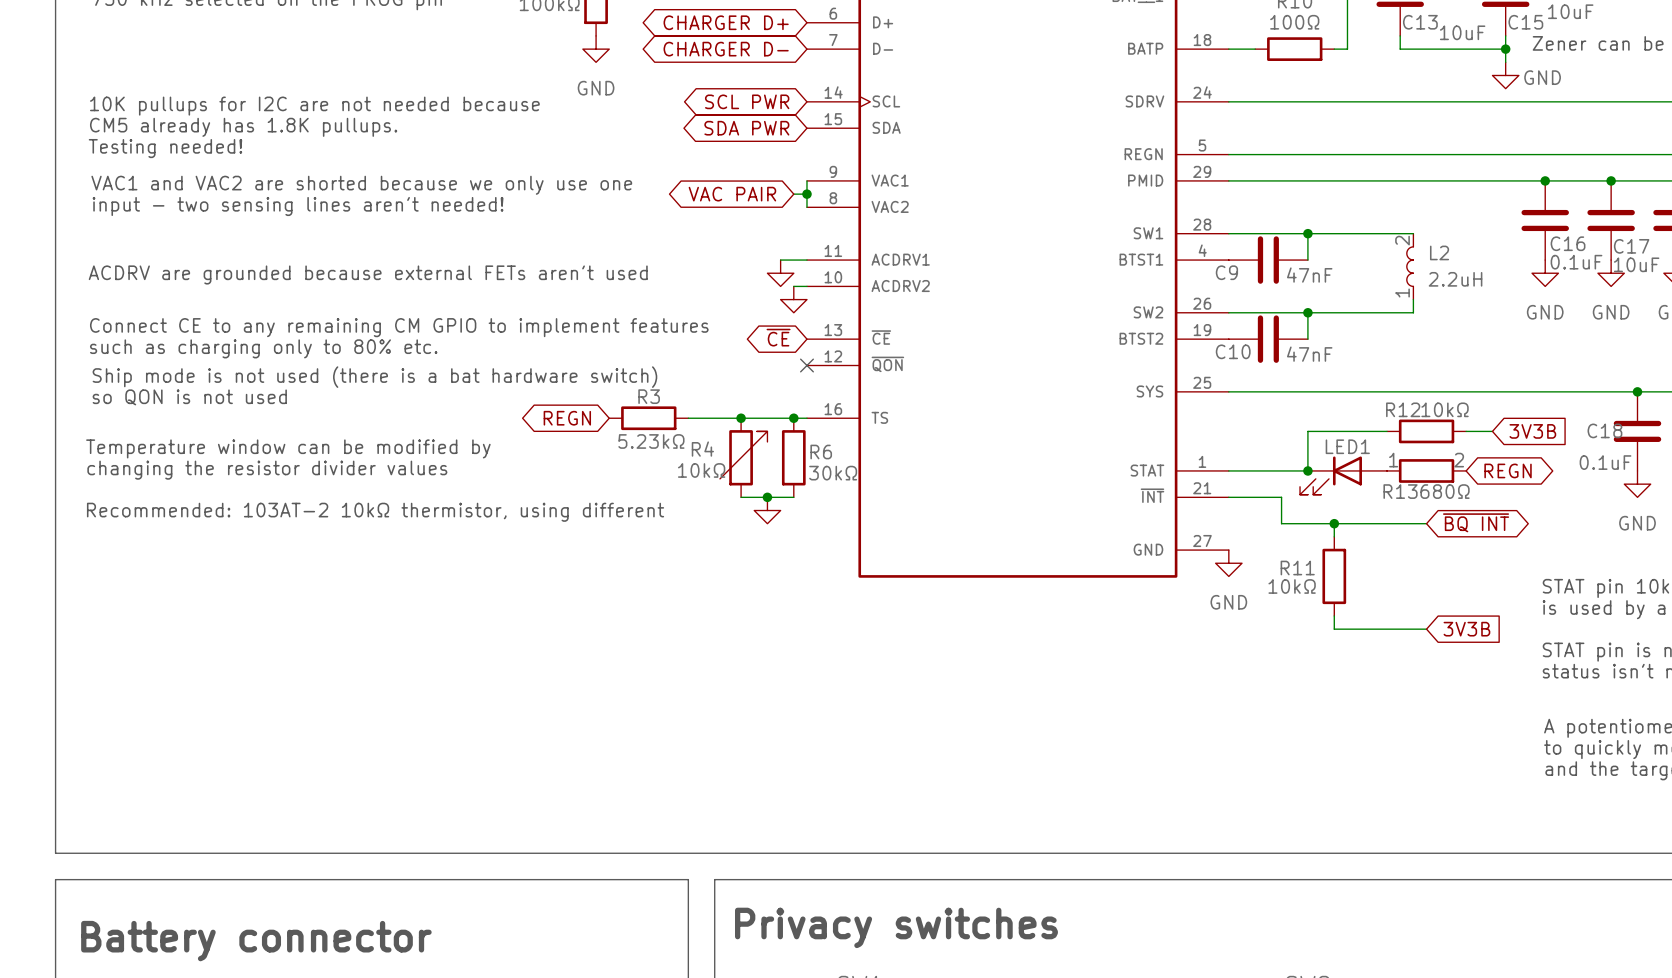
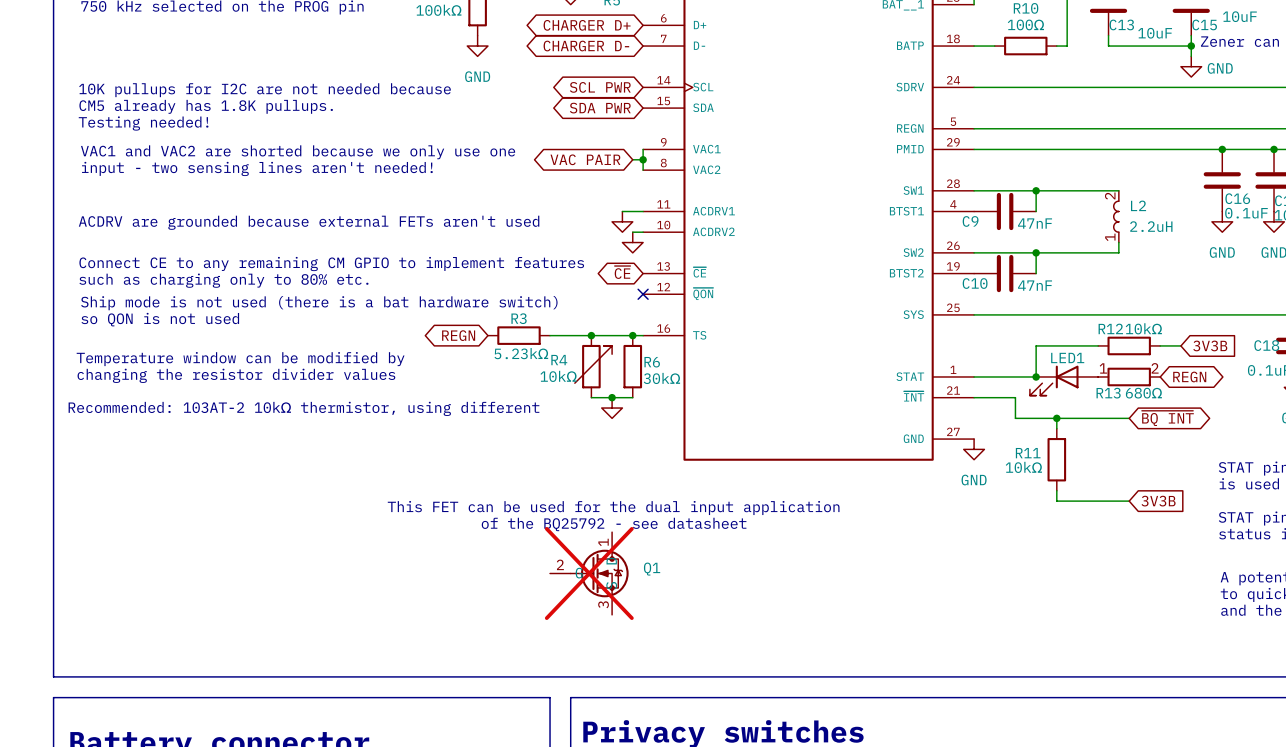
text: none -> This FET can be used for the dual input application (613, 508)
text: none -> of the BQ25792 - see datasheet (614, 524)
Q1: none -> (589, 573)

